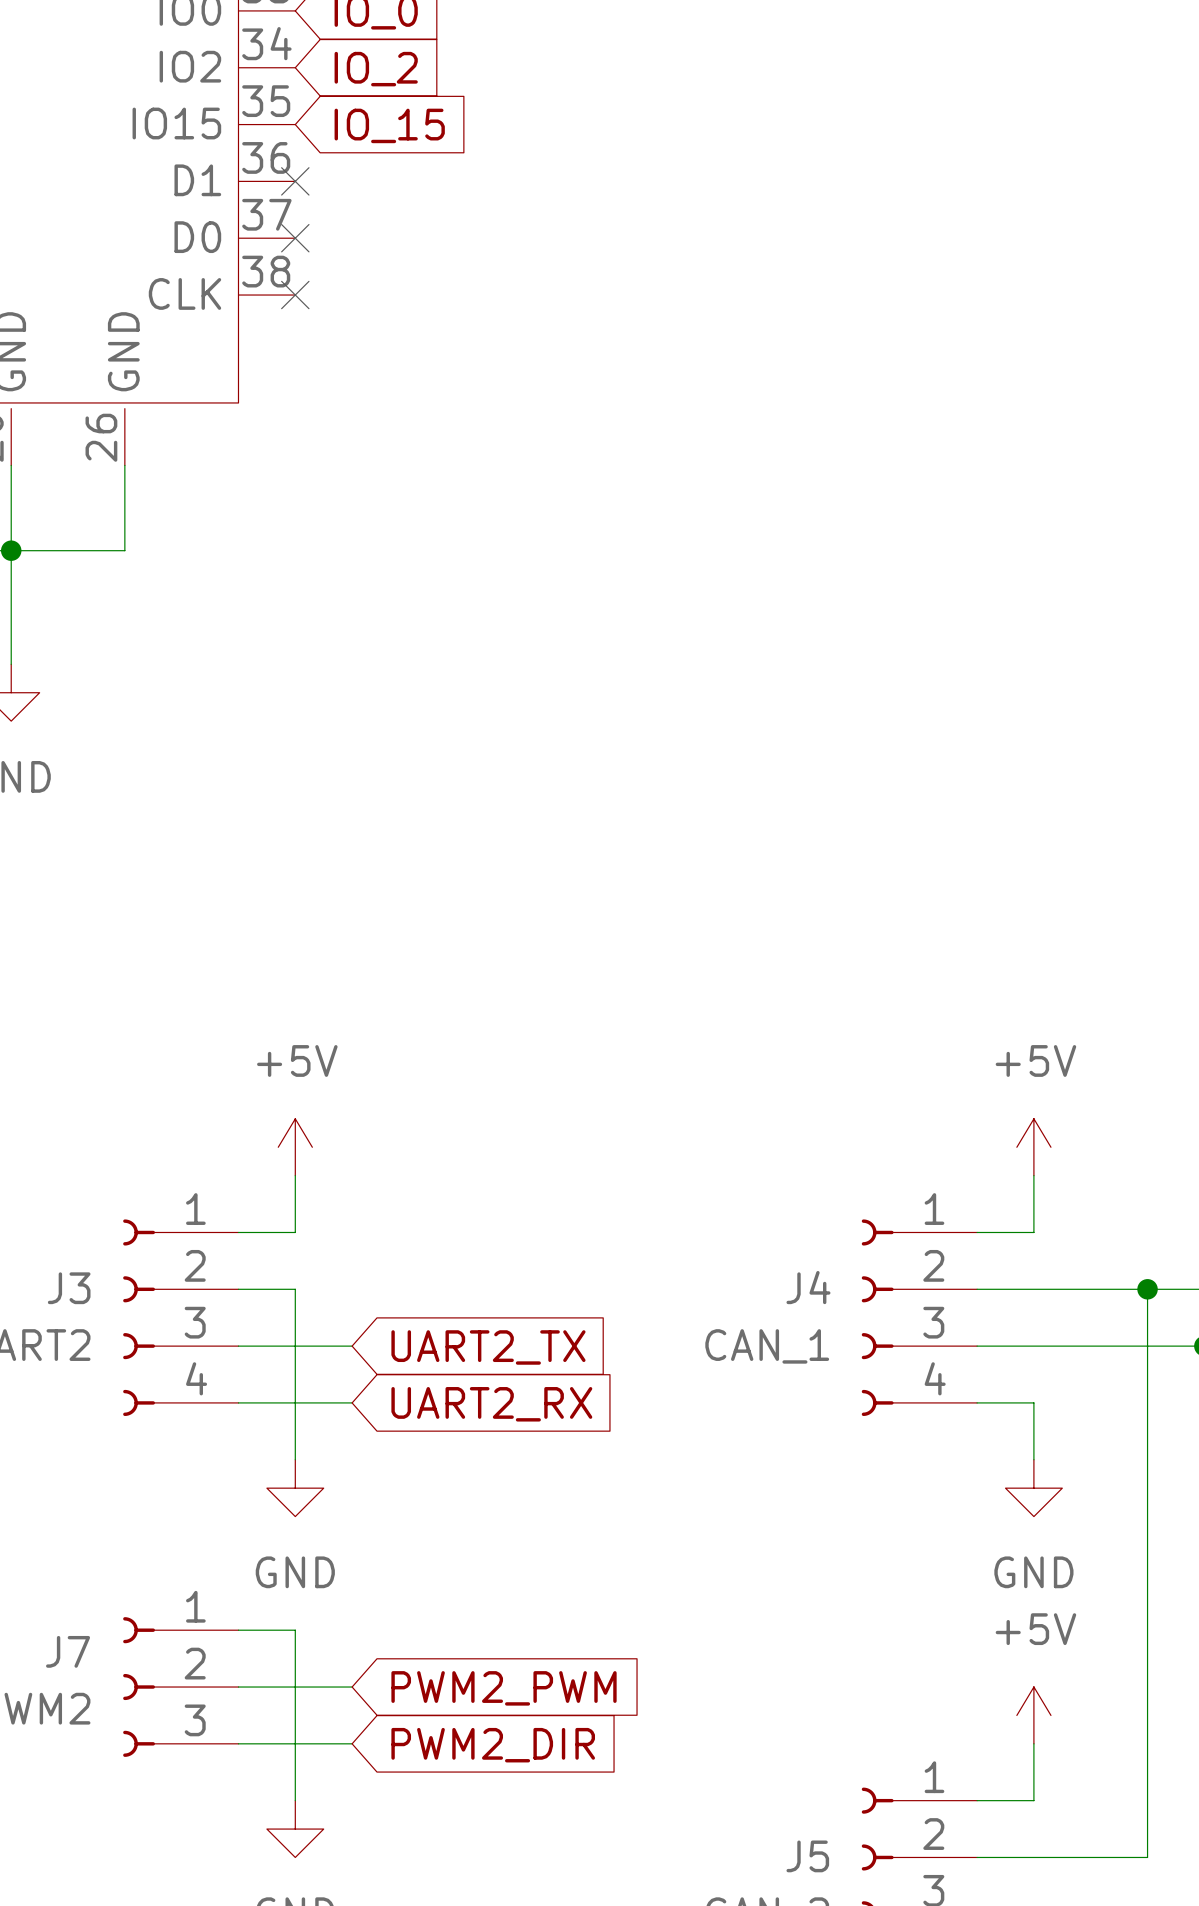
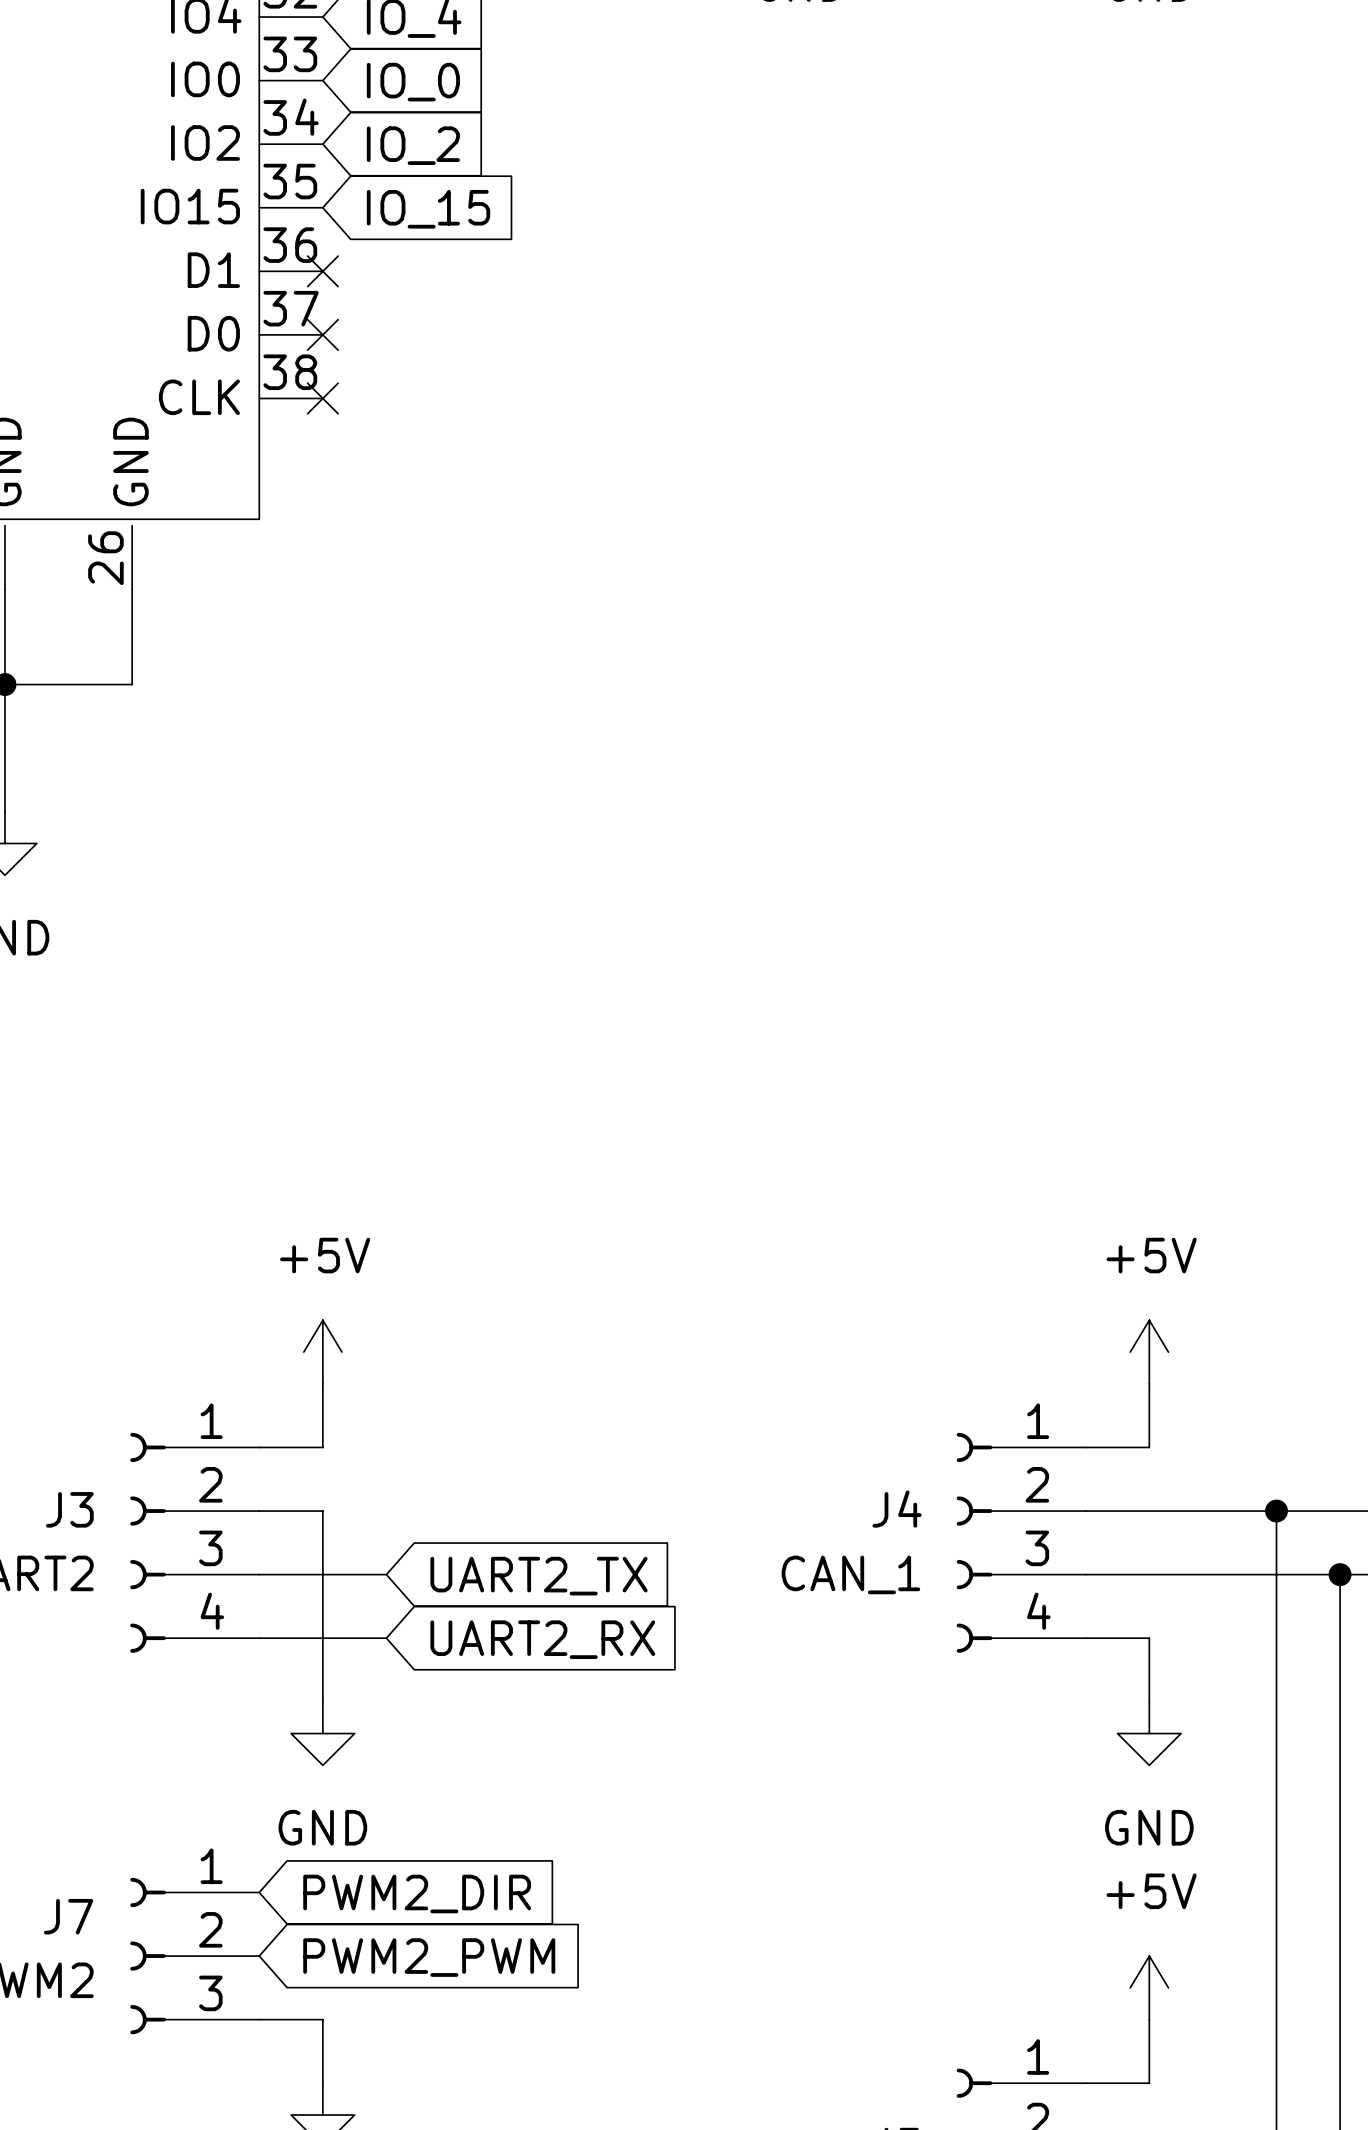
wire: (238, 1630) (295, 1630) (295, 1743) (352, 1743) -> none
wire: (238, 1687) (352, 1687) -> none
global label position: PWM2_PWM (504, 1688) -> PWM2_PWM (429, 1957)
global label position: PWM2_DIR (493, 1745) -> PWM2_DIR (417, 1894)

